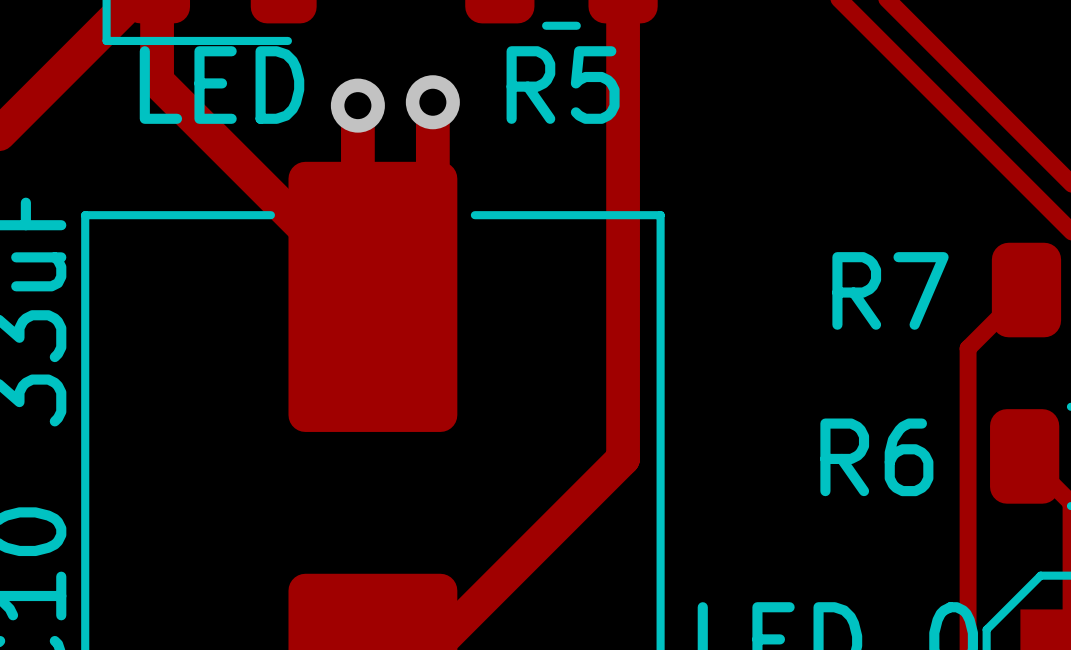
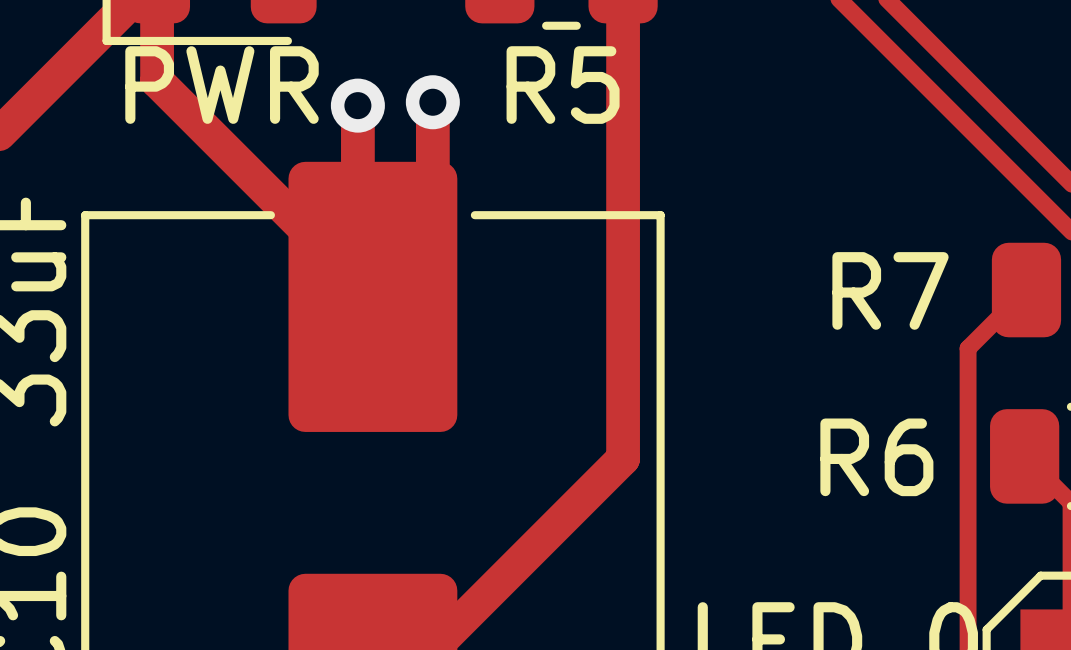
part value: LED (222, 85) -> PWR (222, 85)

